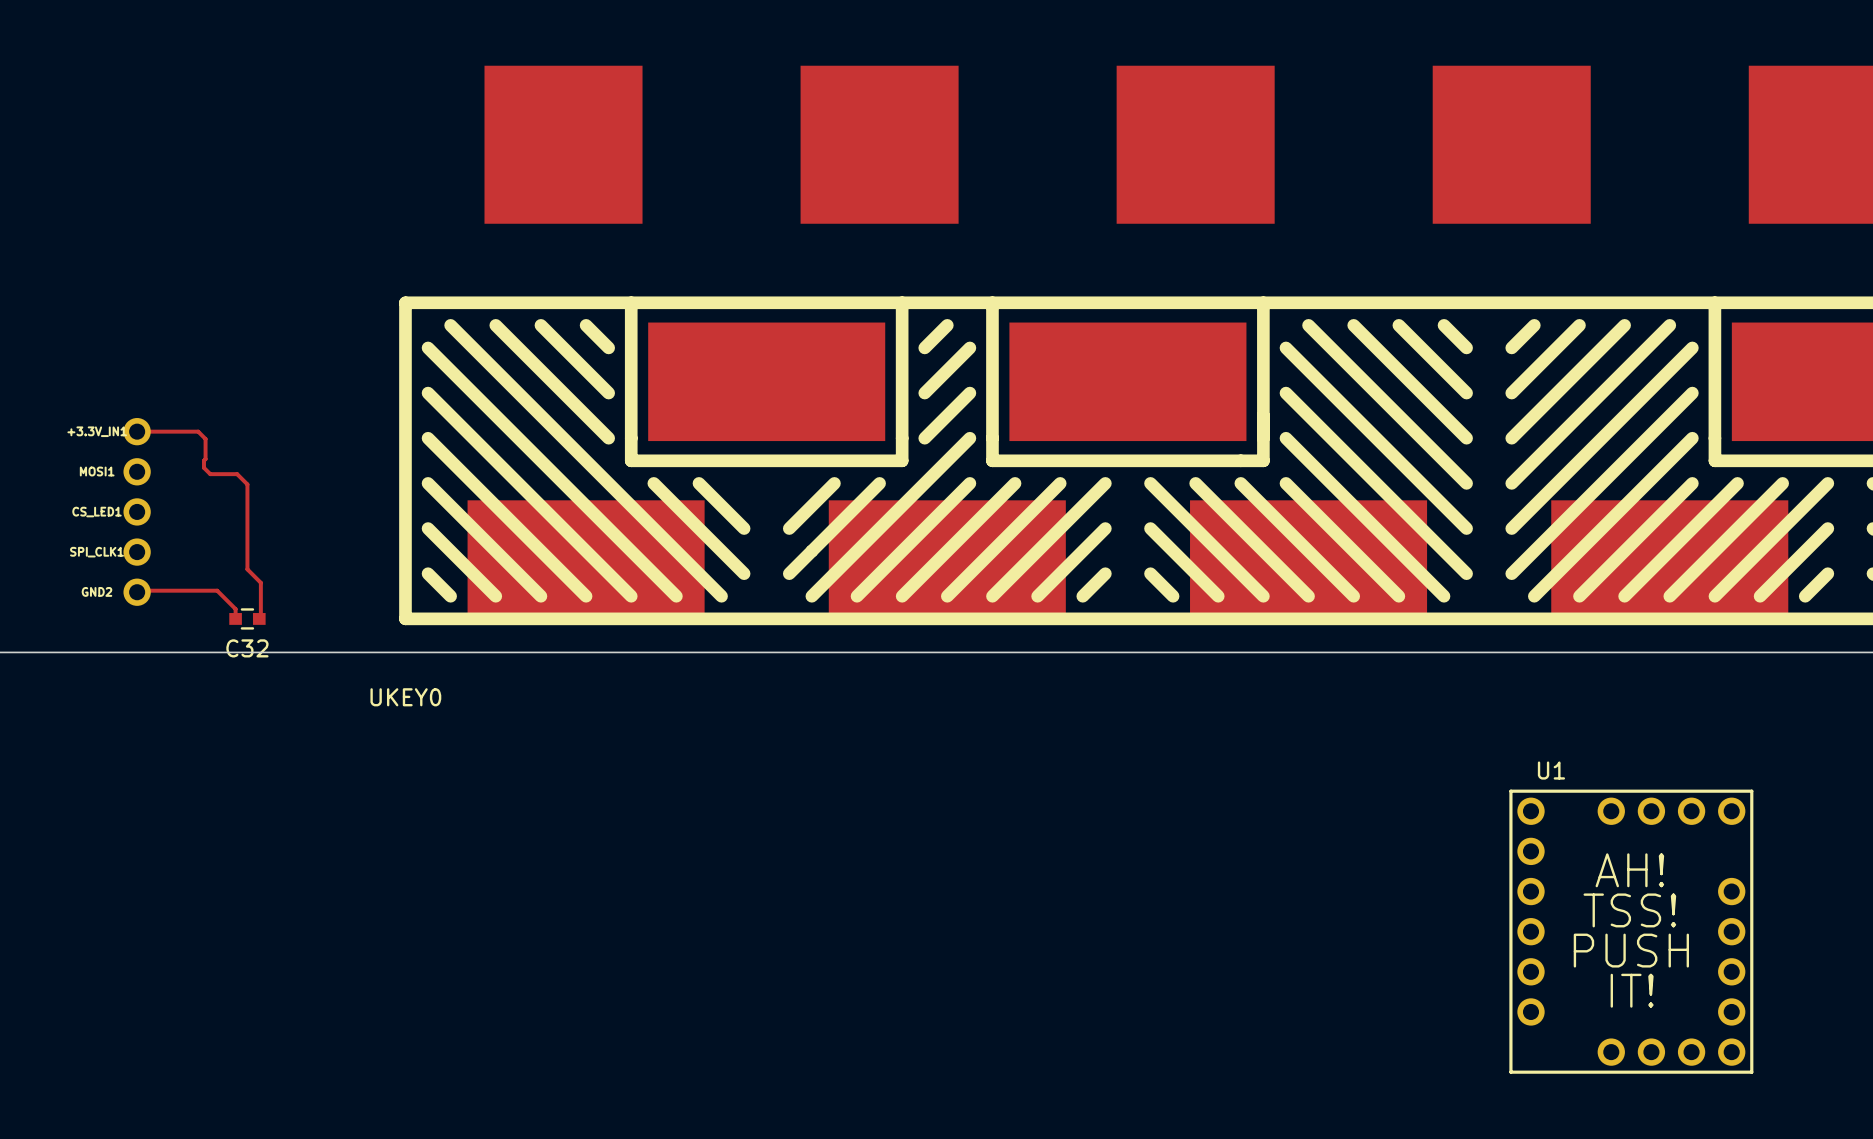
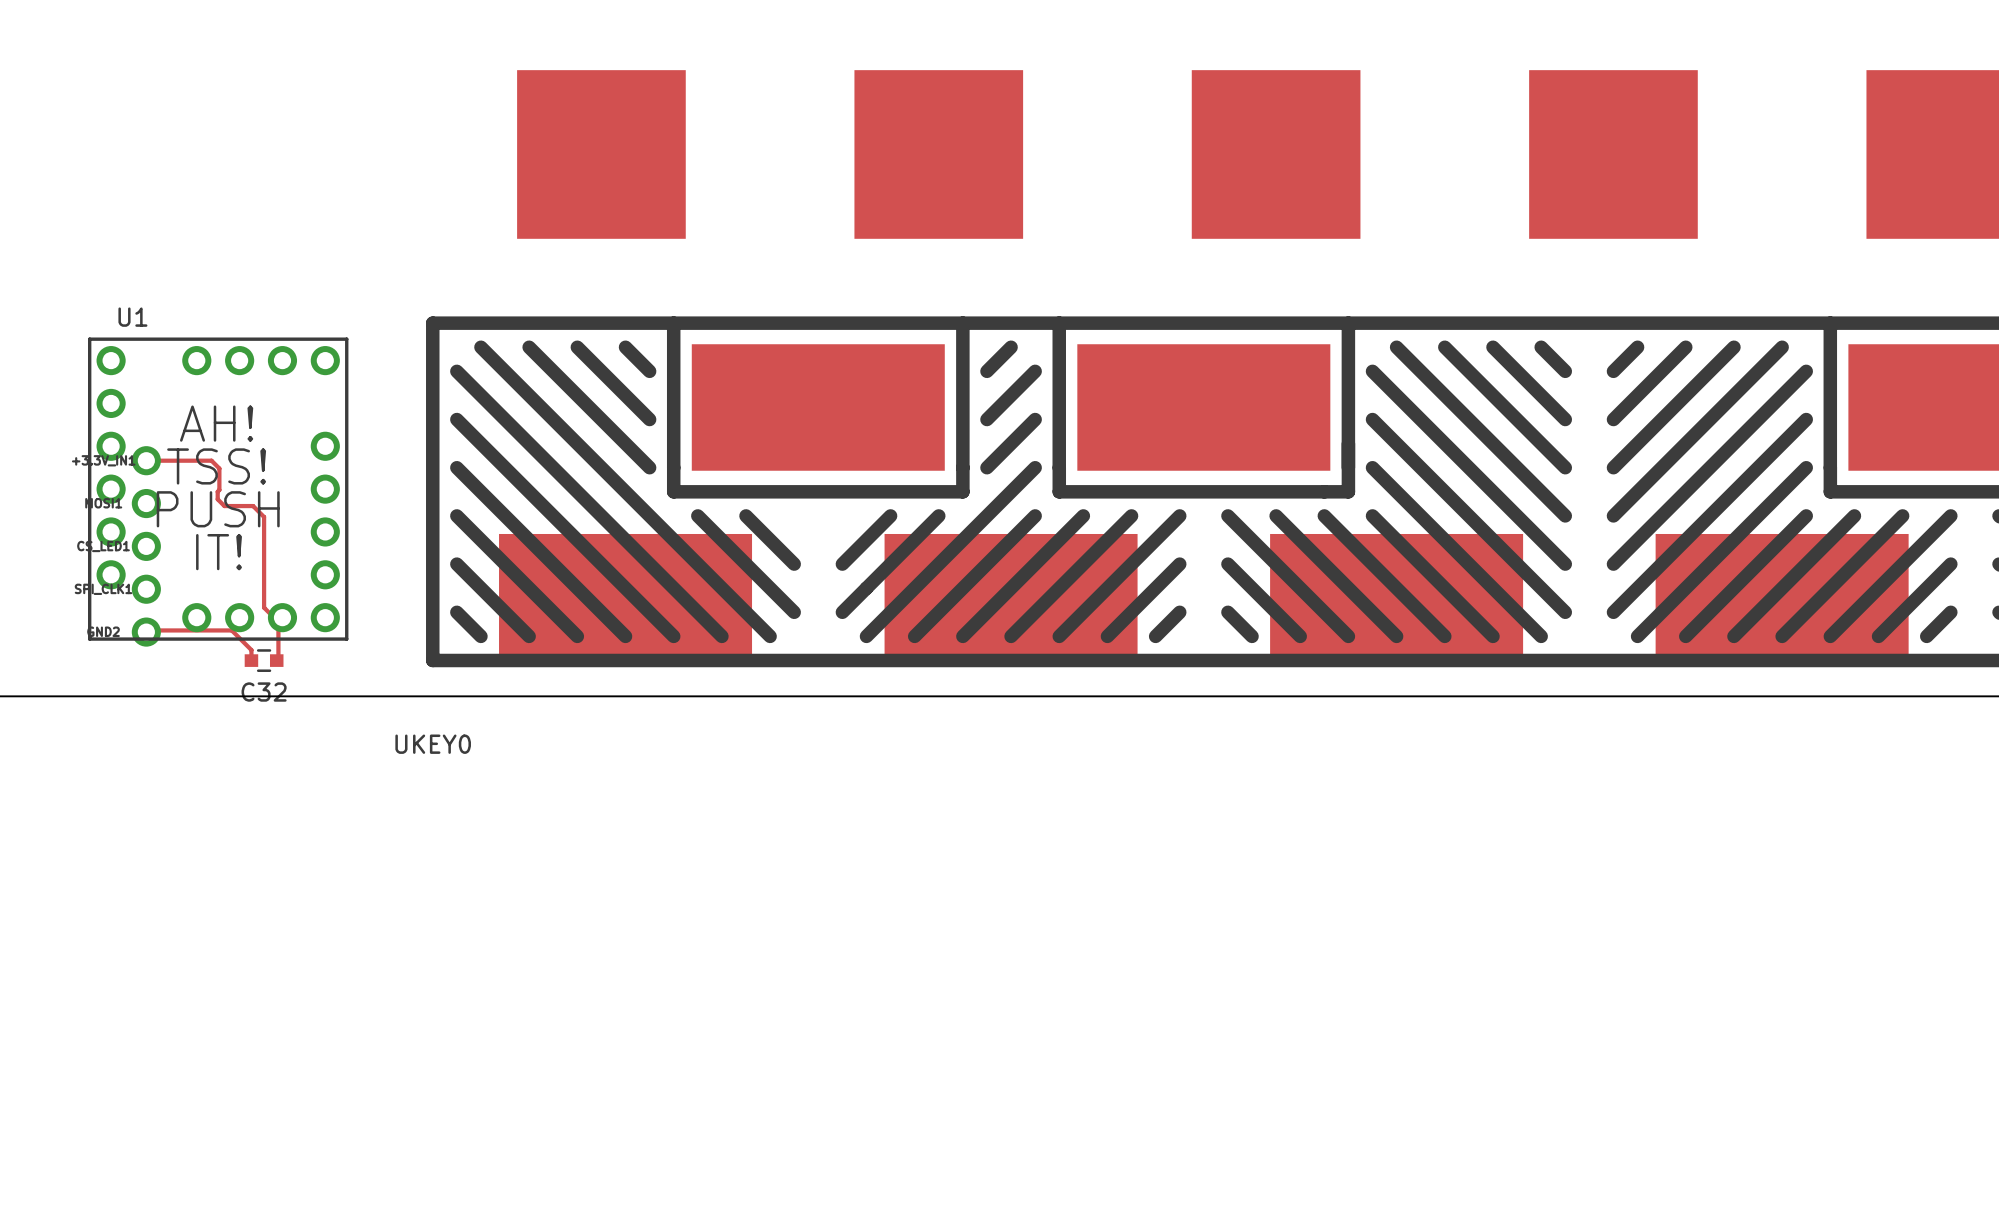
U1 position: (1631, 931) -> (218, 489)

